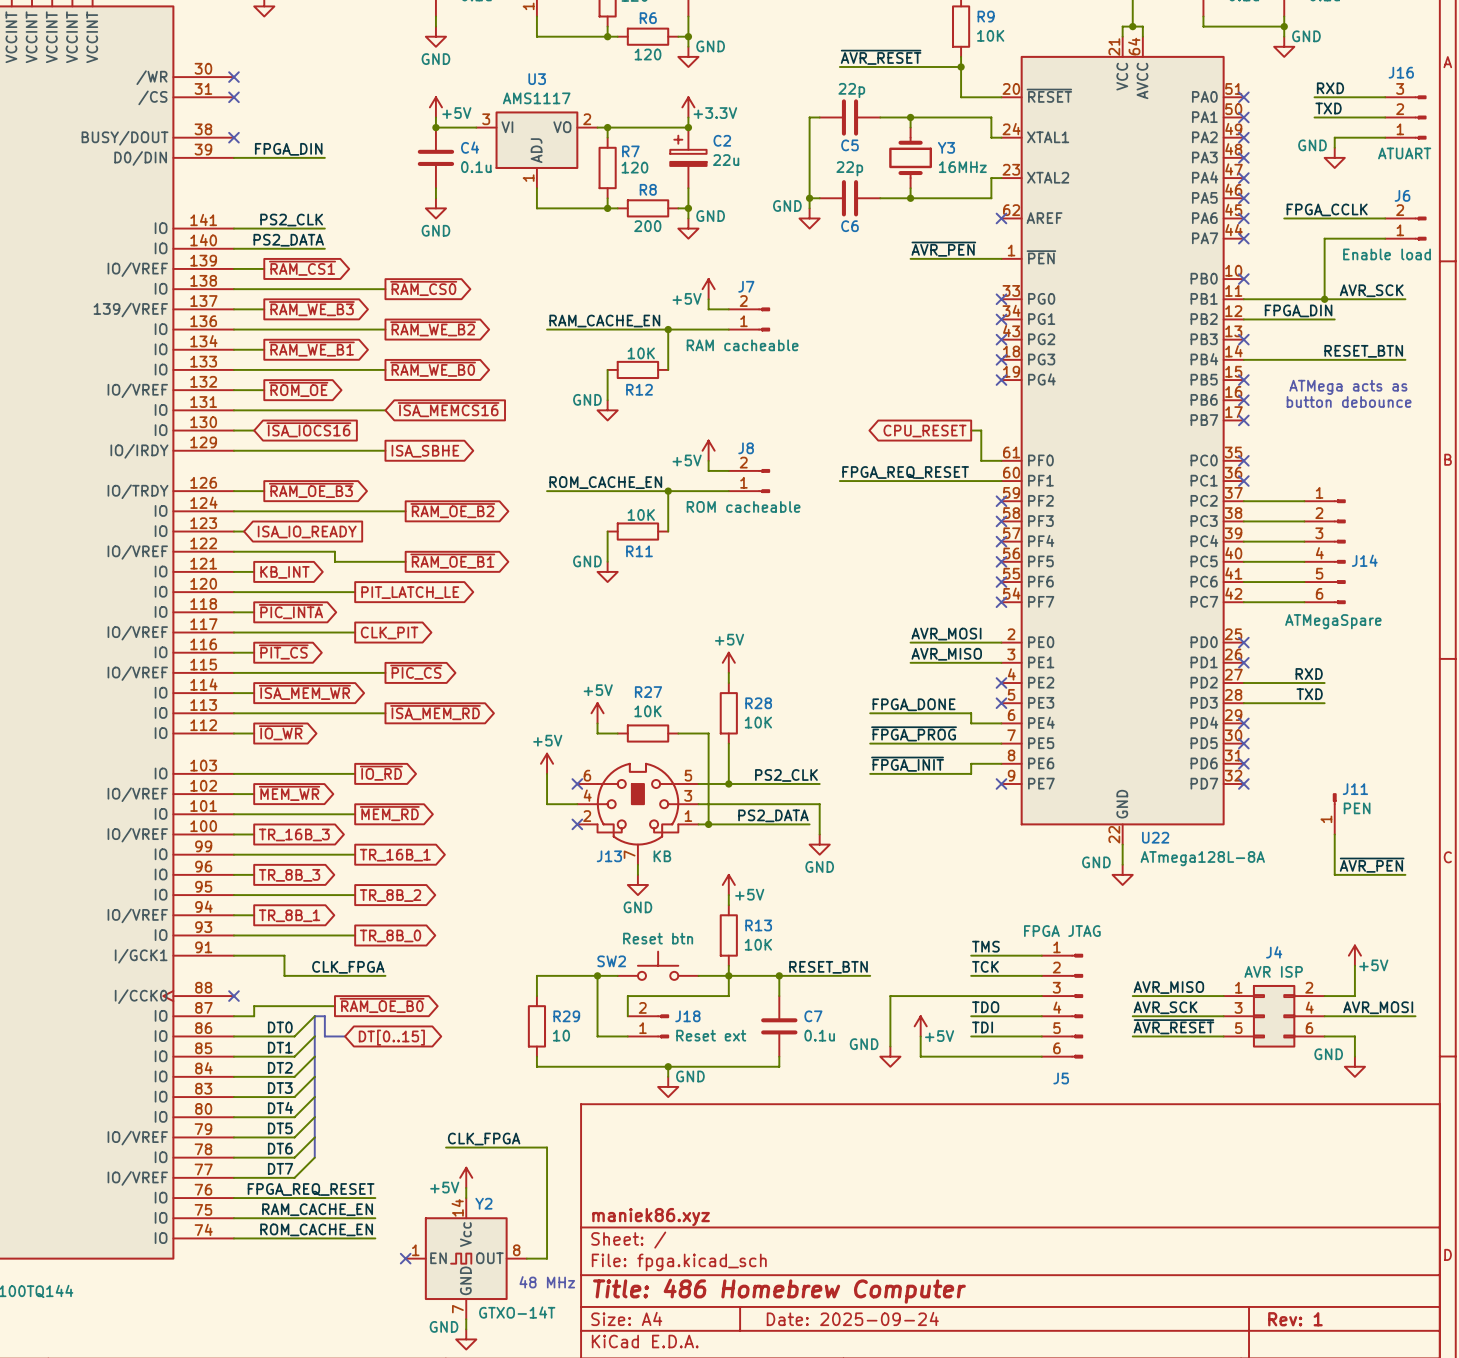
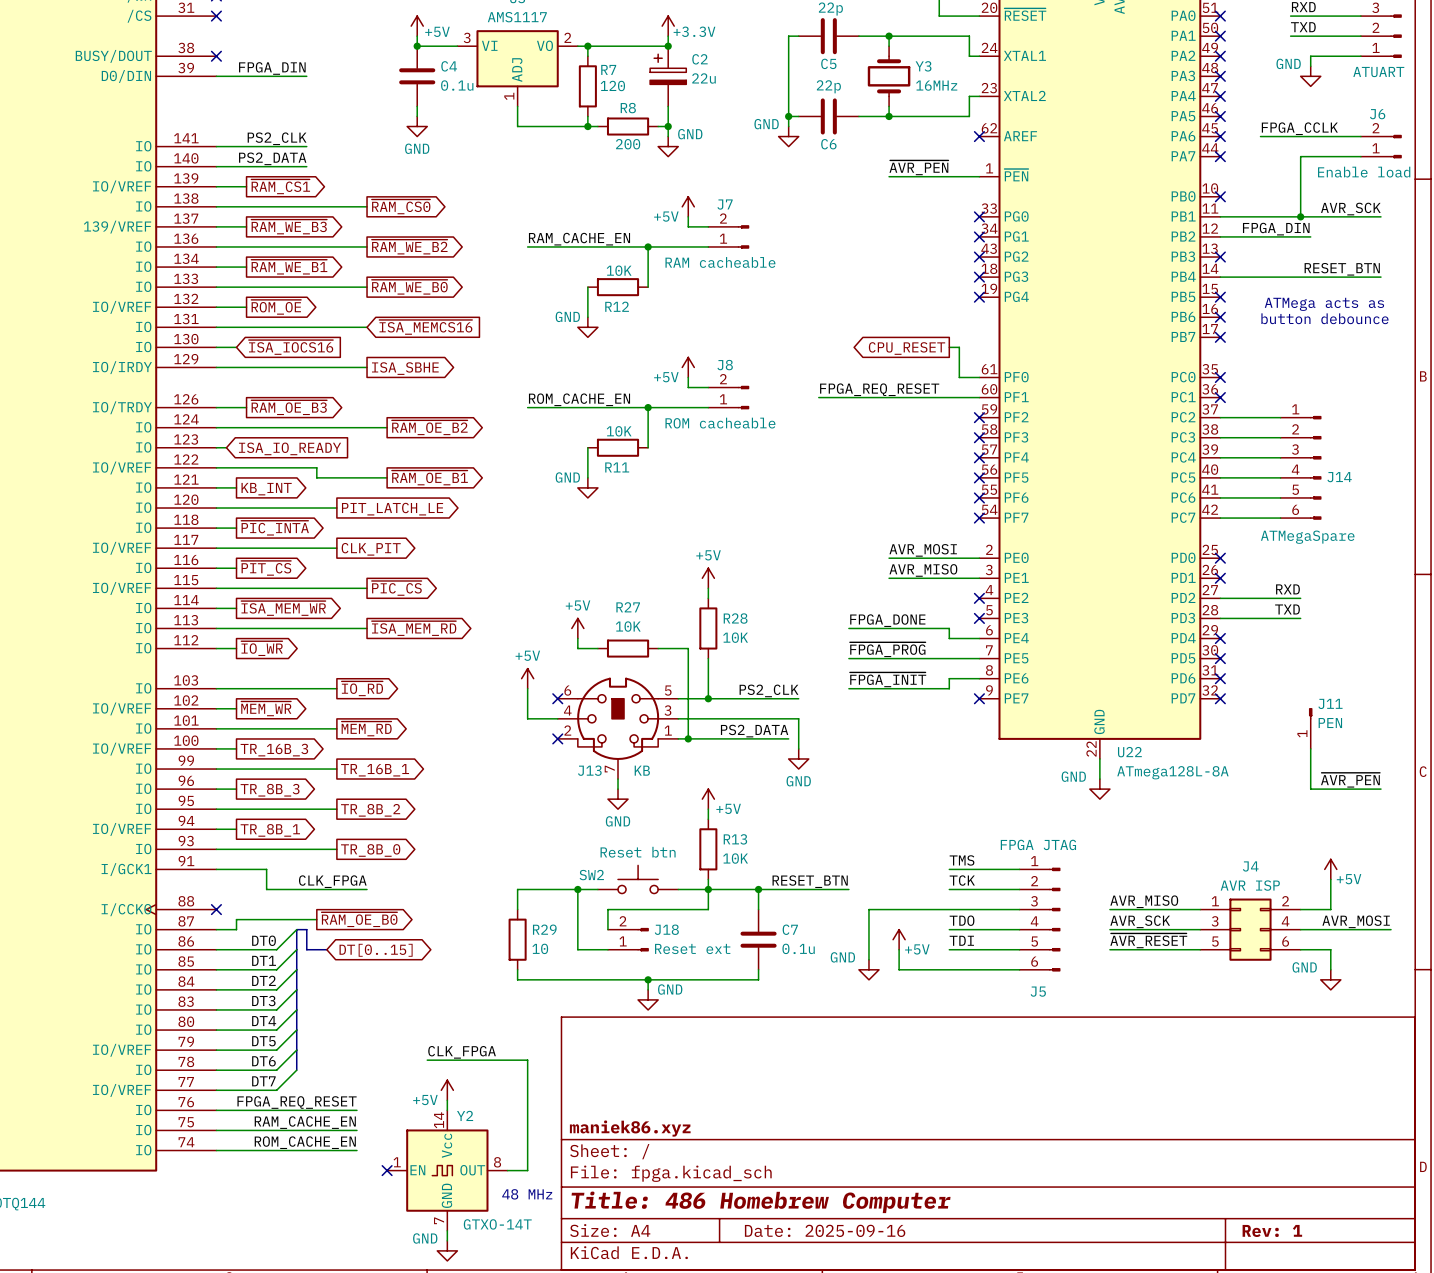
title block: Date: 2025-09-24 (852, 1318) -> Date: 2025-09-16 (825, 1230)

